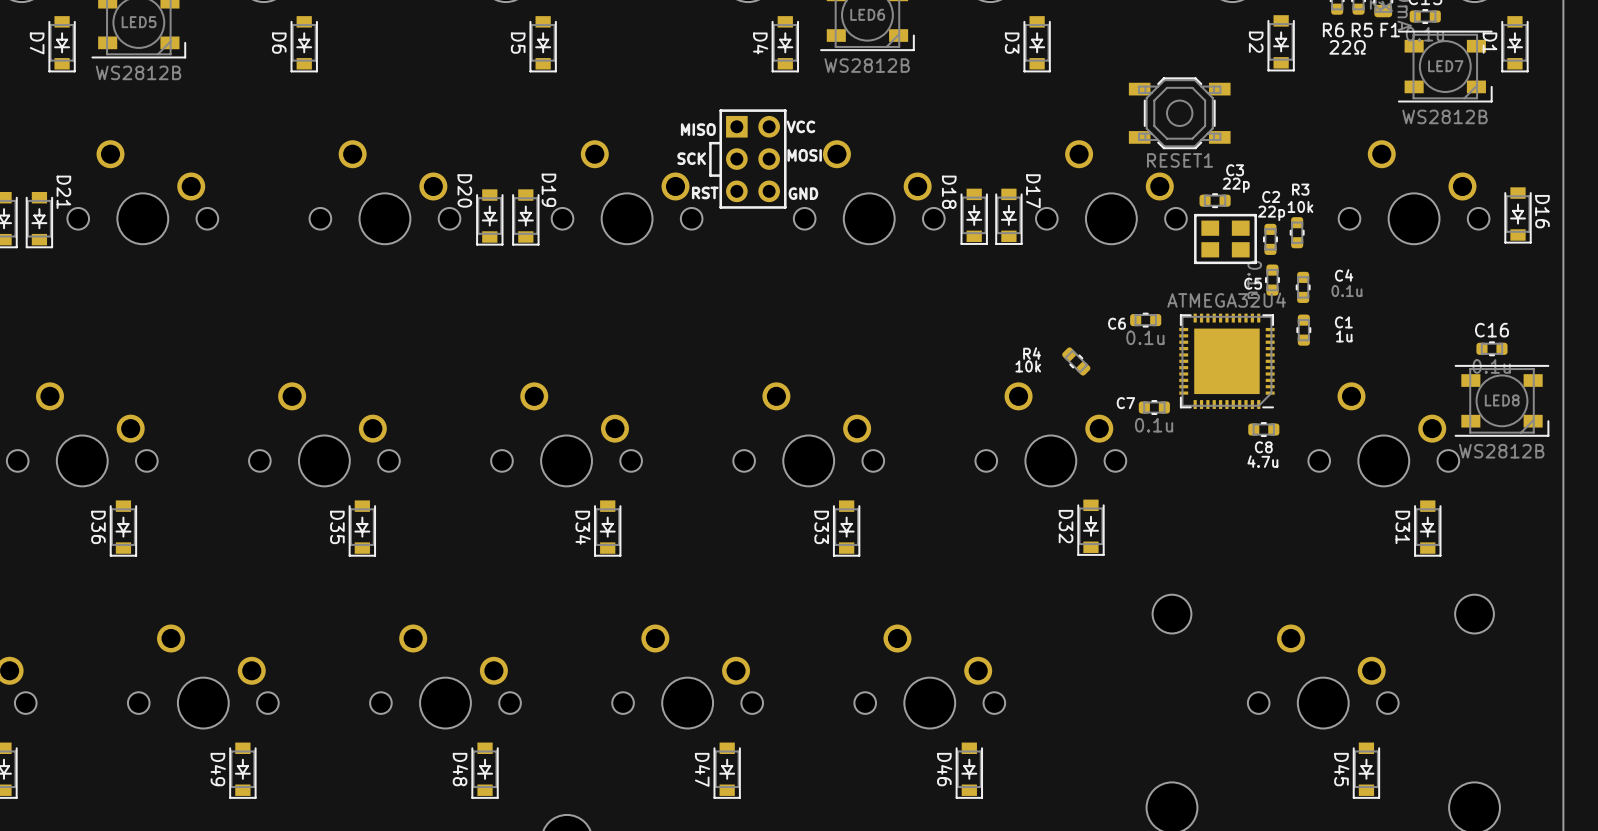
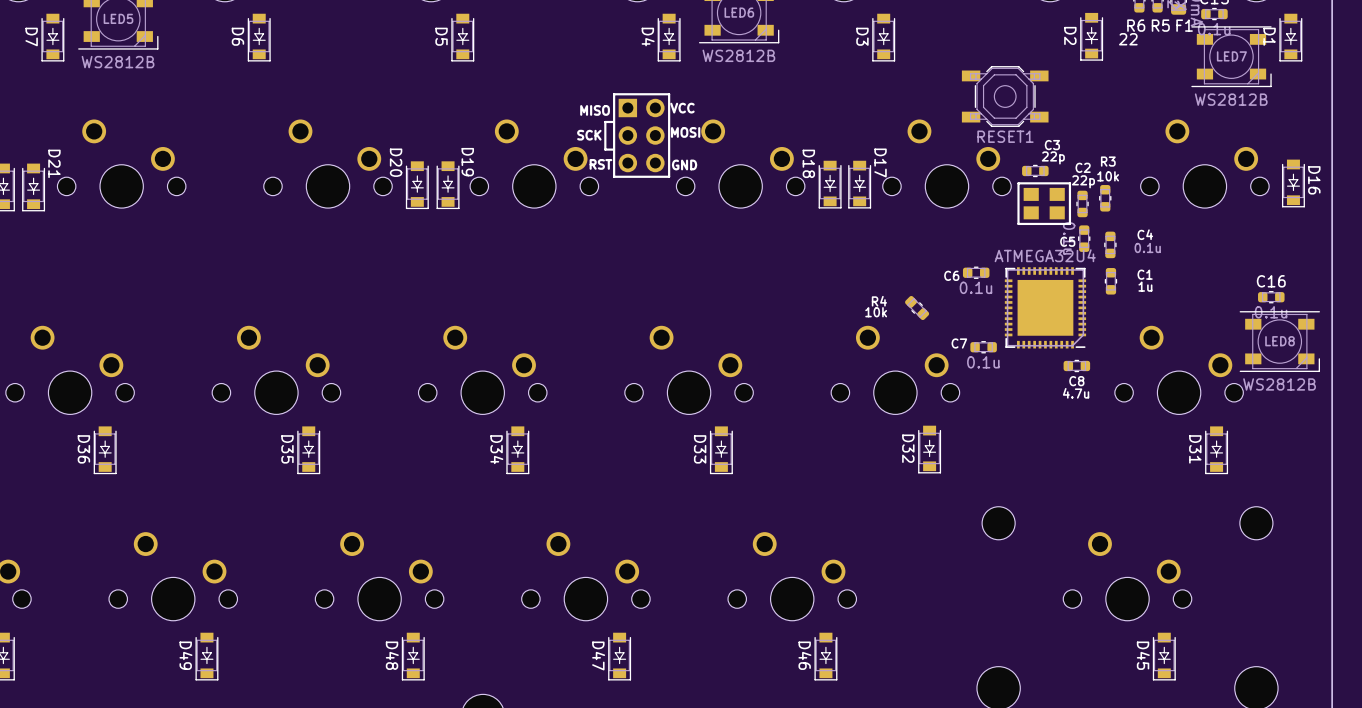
R6 value: 22Ω (1347, 47) -> 22 (1128, 39)

